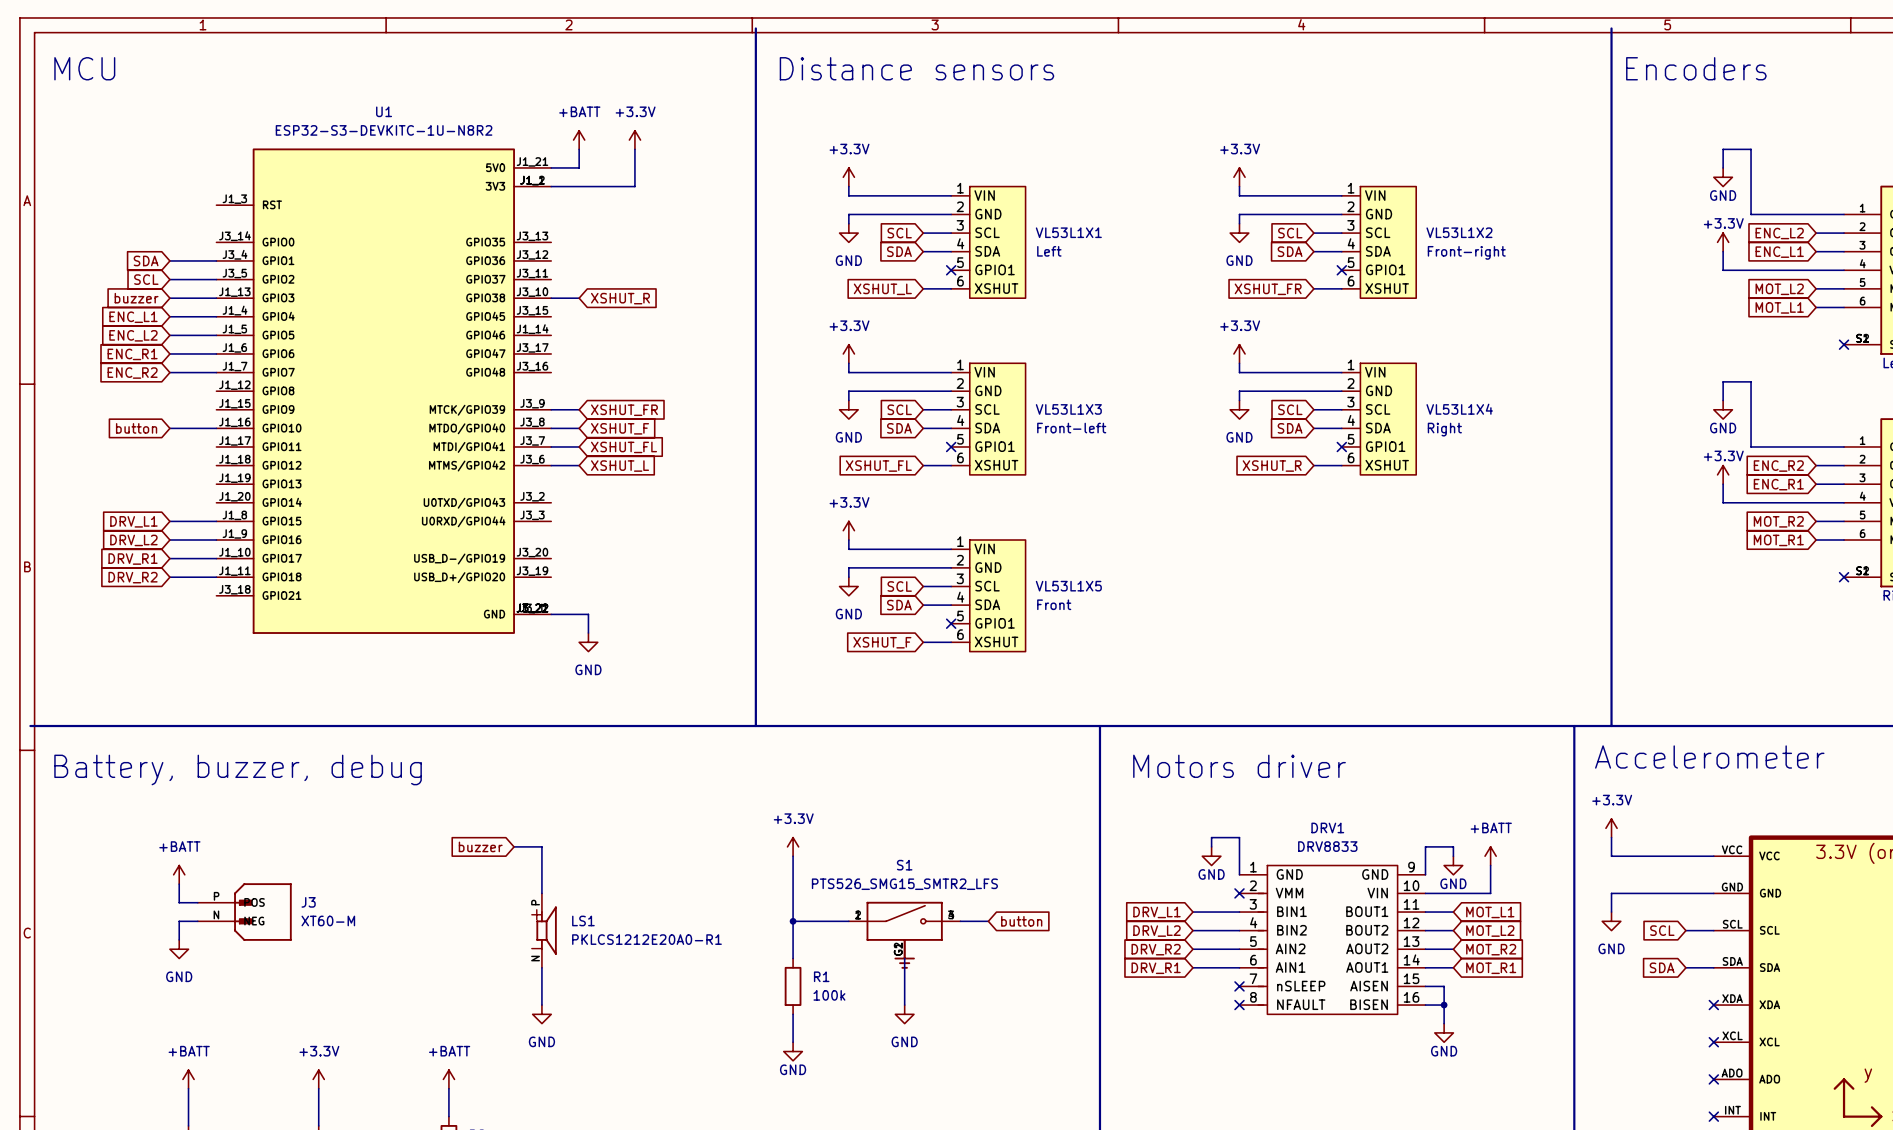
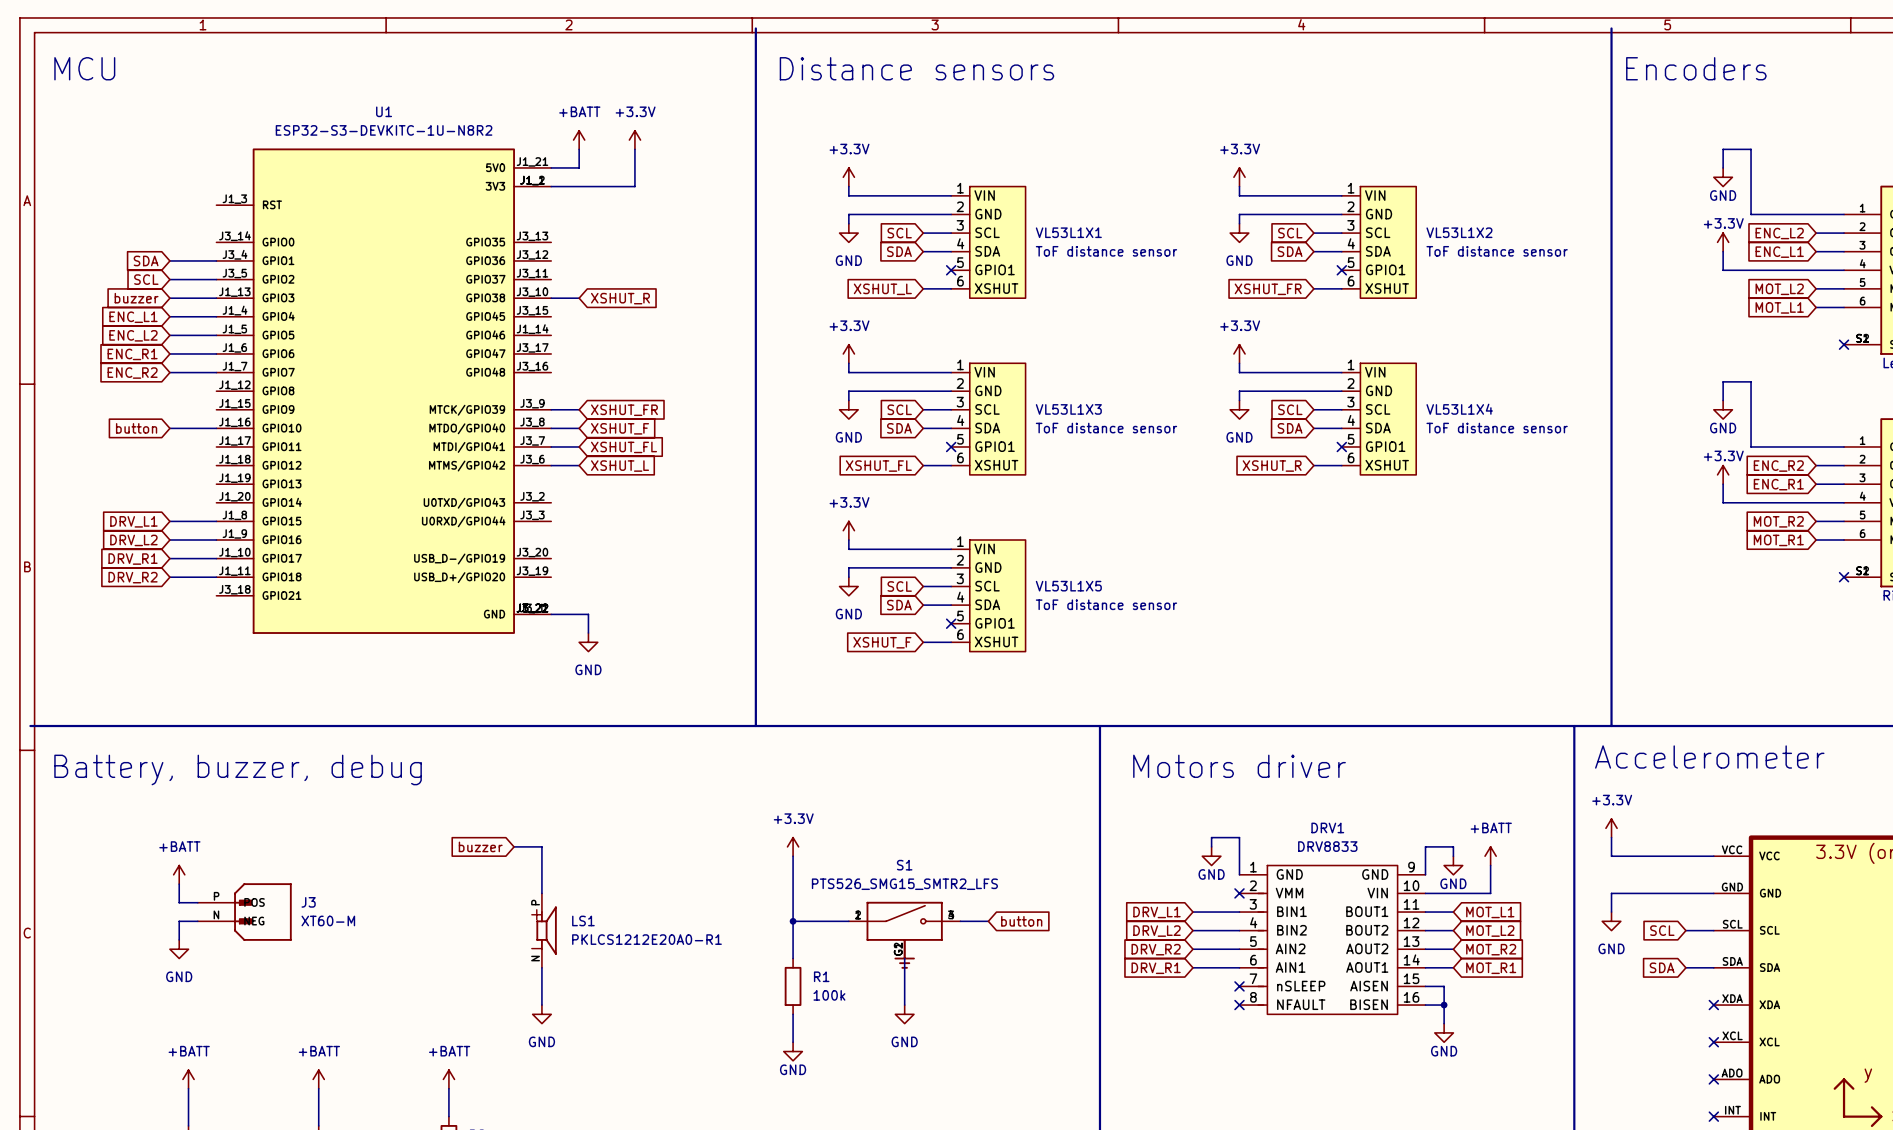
VL53L1X1 value: Left (1049, 251) -> ToF distance sensor (1106, 251)
VL53L1X2 value: Front-right (1466, 252) -> ToF distance sensor (1497, 251)
VL53L1X3 value: Front-left (1071, 428) -> ToF distance sensor (1106, 428)
VL53L1X4 value: Right (1444, 429) -> ToF distance sensor (1497, 428)
VL53L1X5 value: Front (1054, 604) -> ToF distance sensor (1106, 604)
power symbol: +3.3V (318, 1079) -> +BATT (318, 1079)

